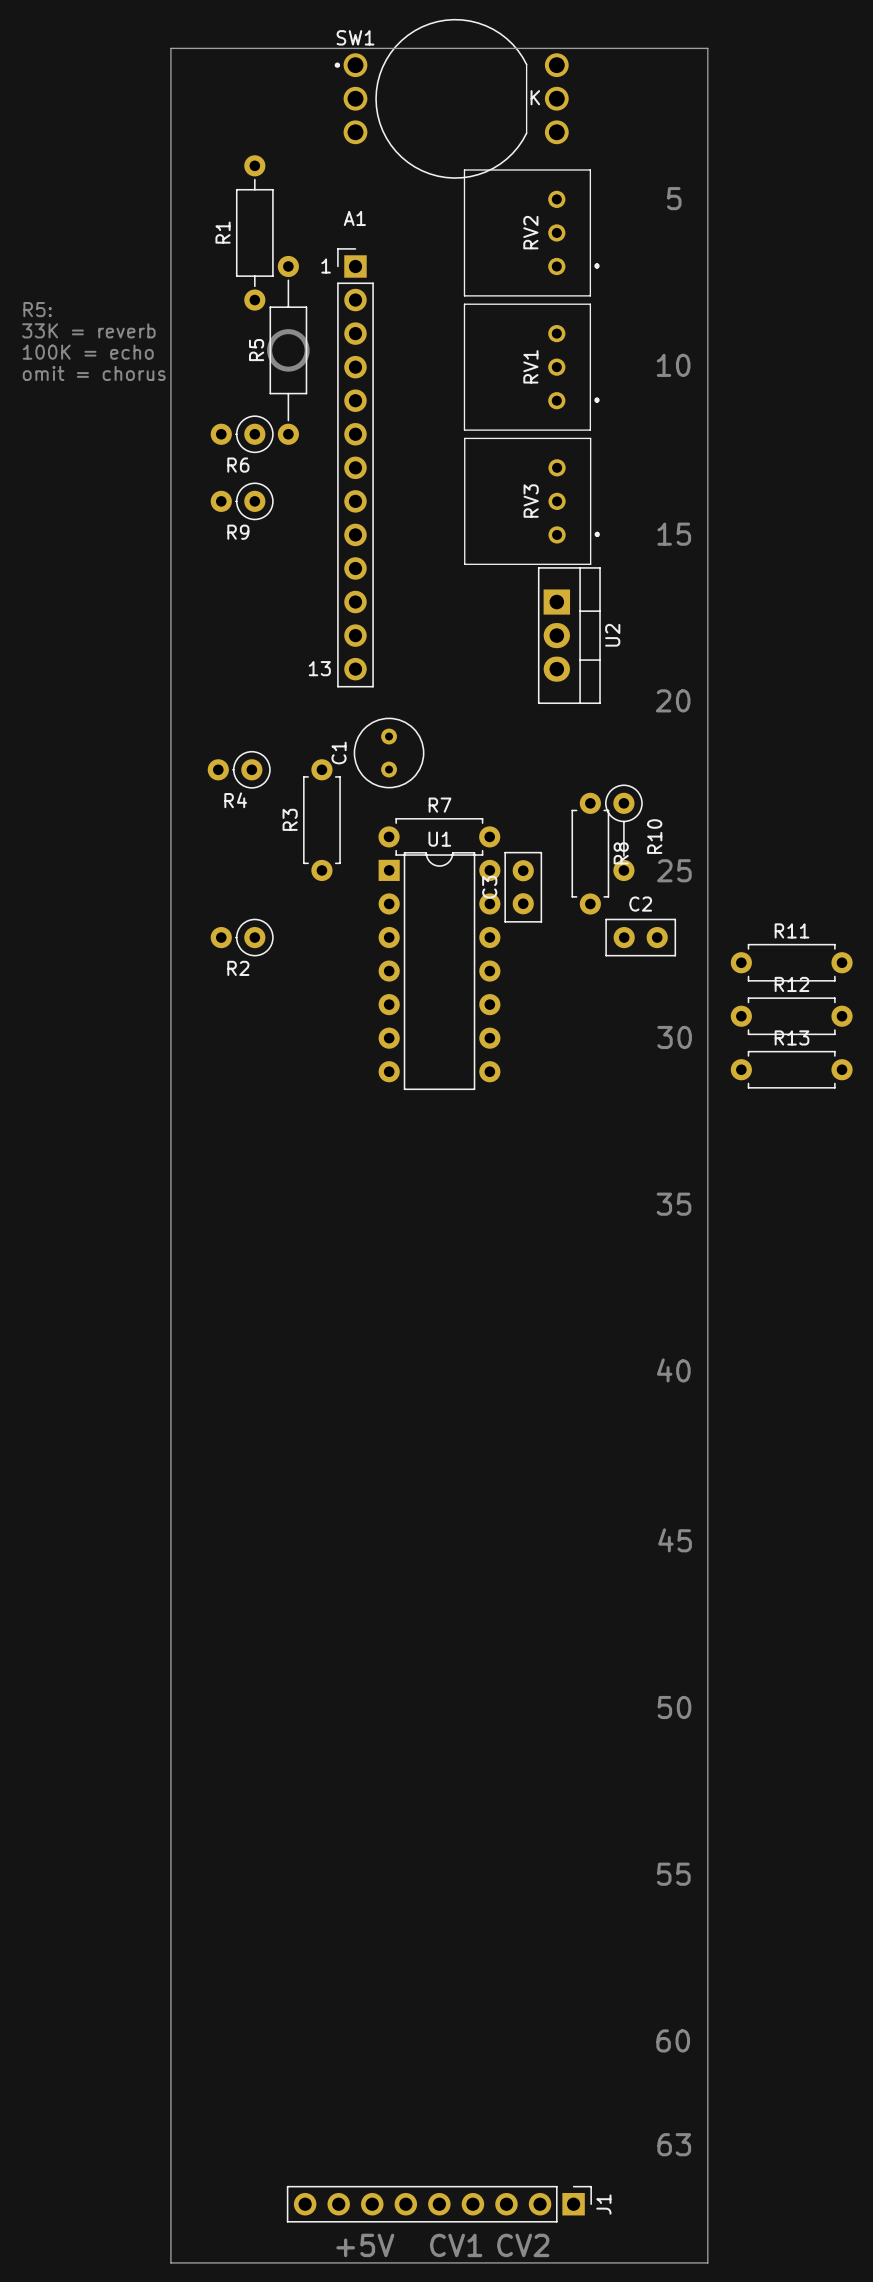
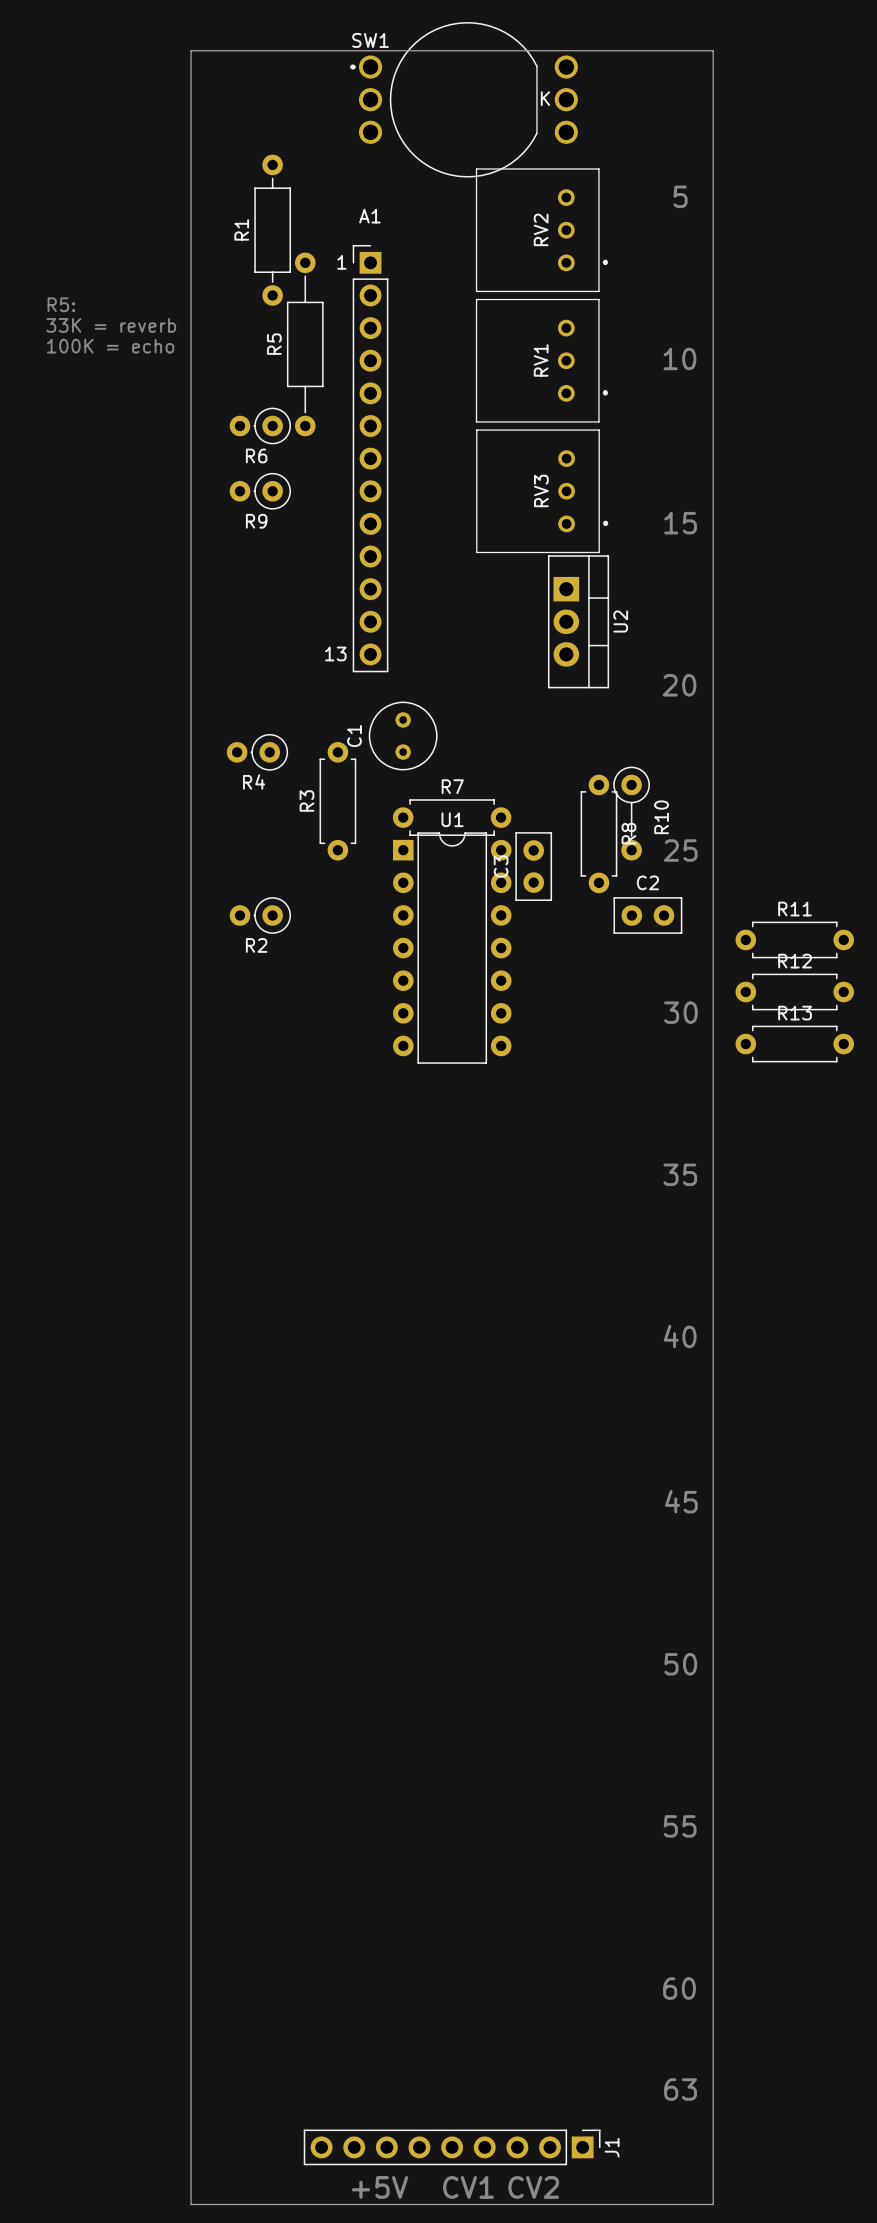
drawing: [267, 329, 310, 372] -> none
text: omit = chorus (94, 373) -> none

